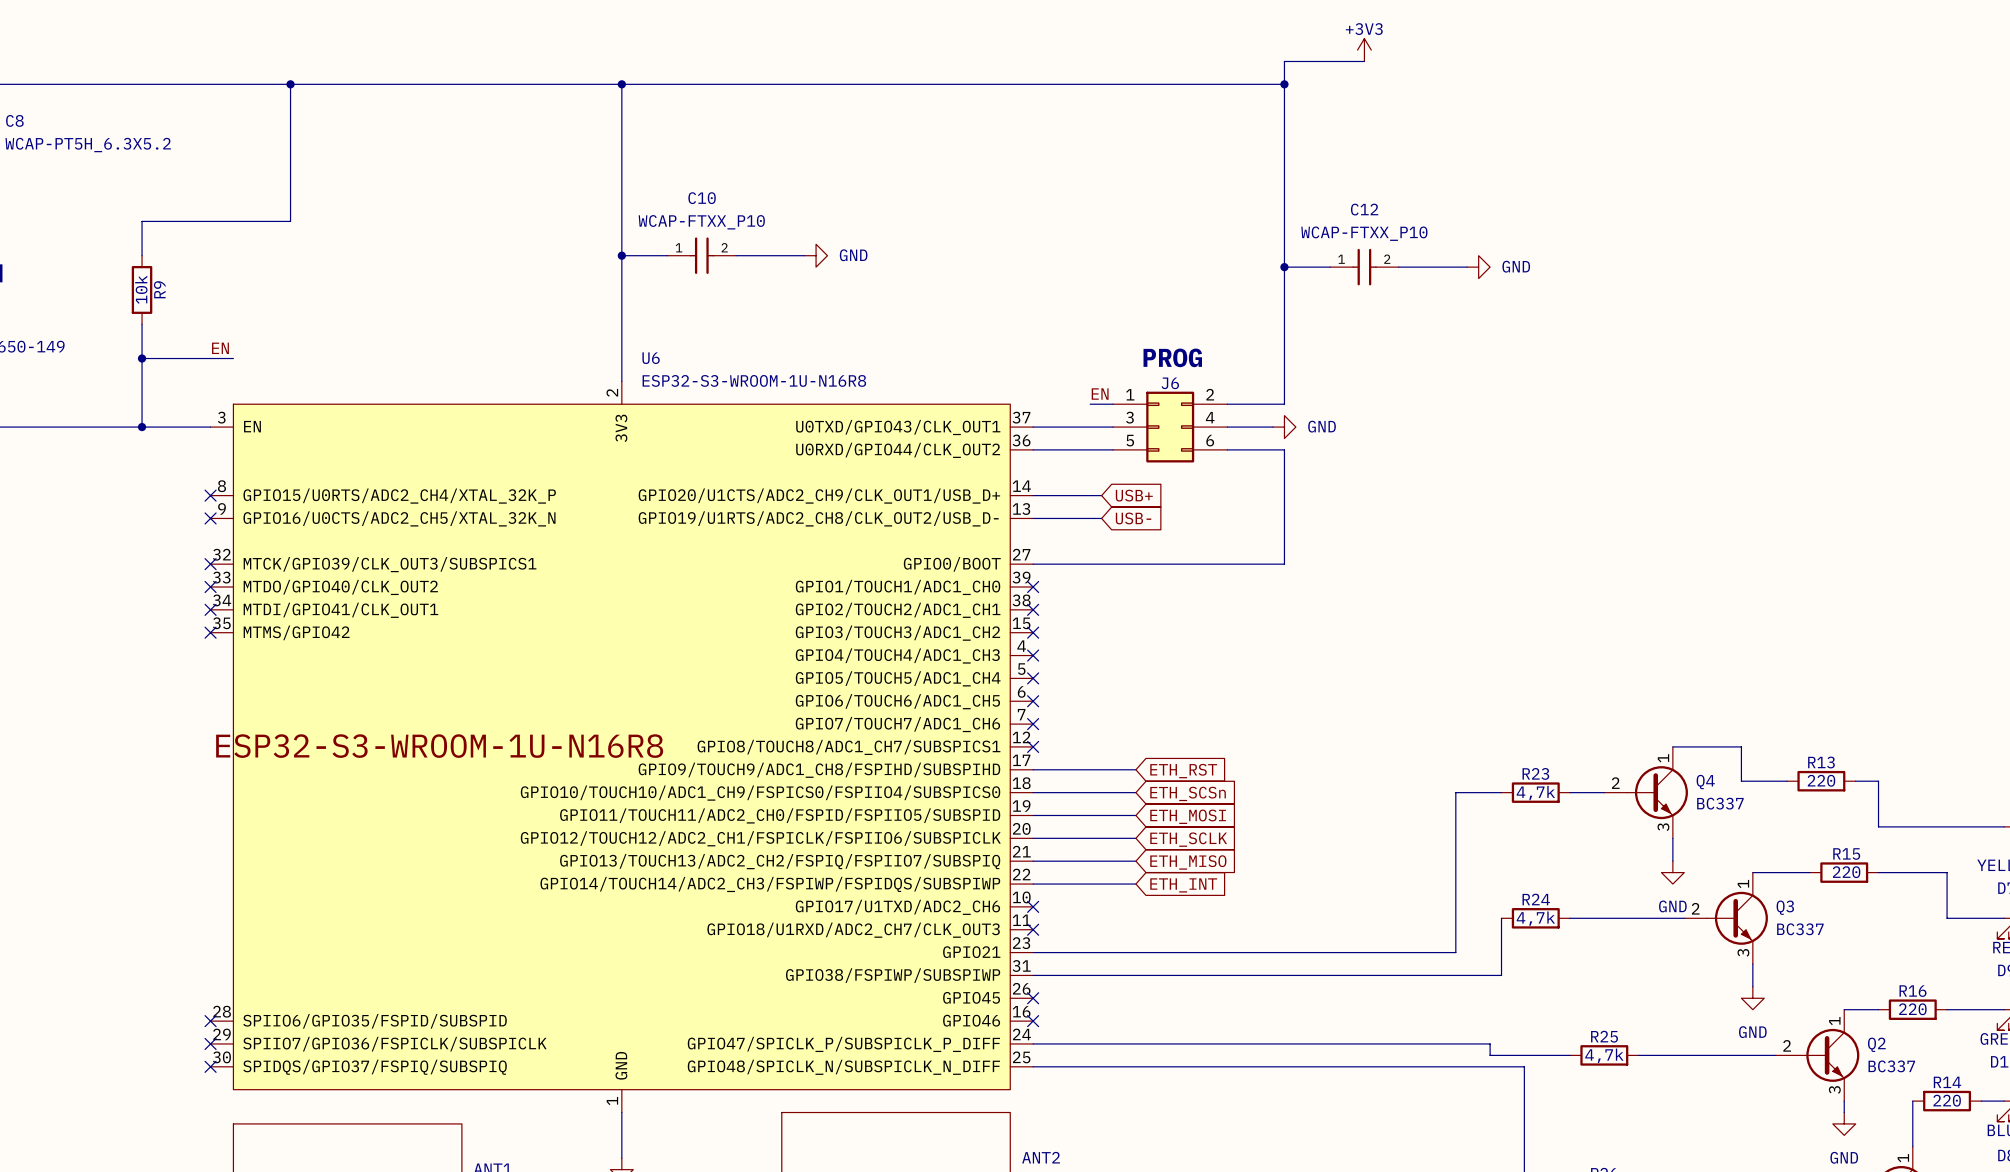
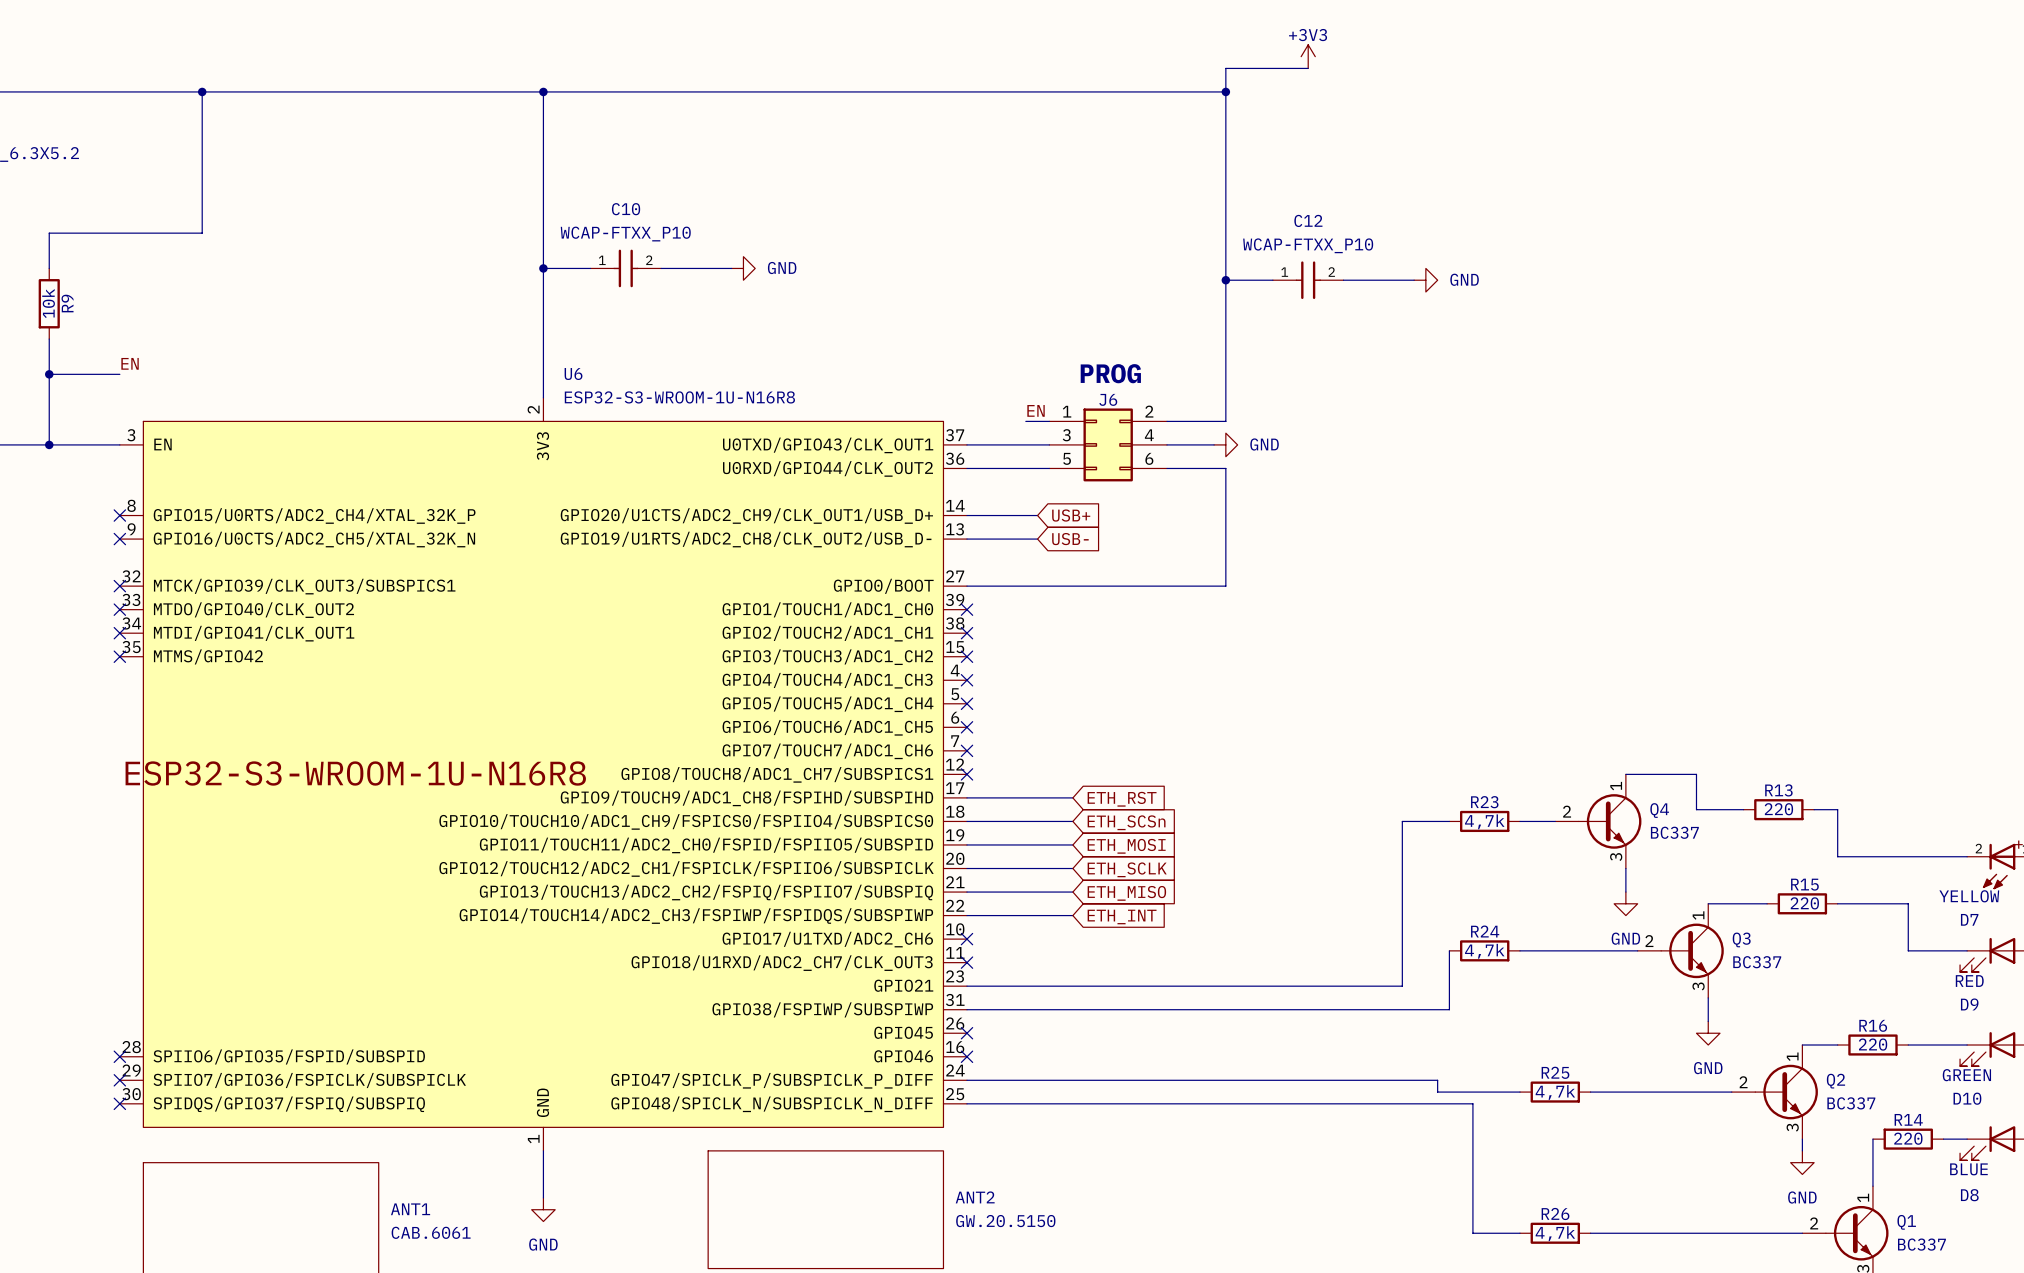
wire: (210, 358) (233, 358) -> none

